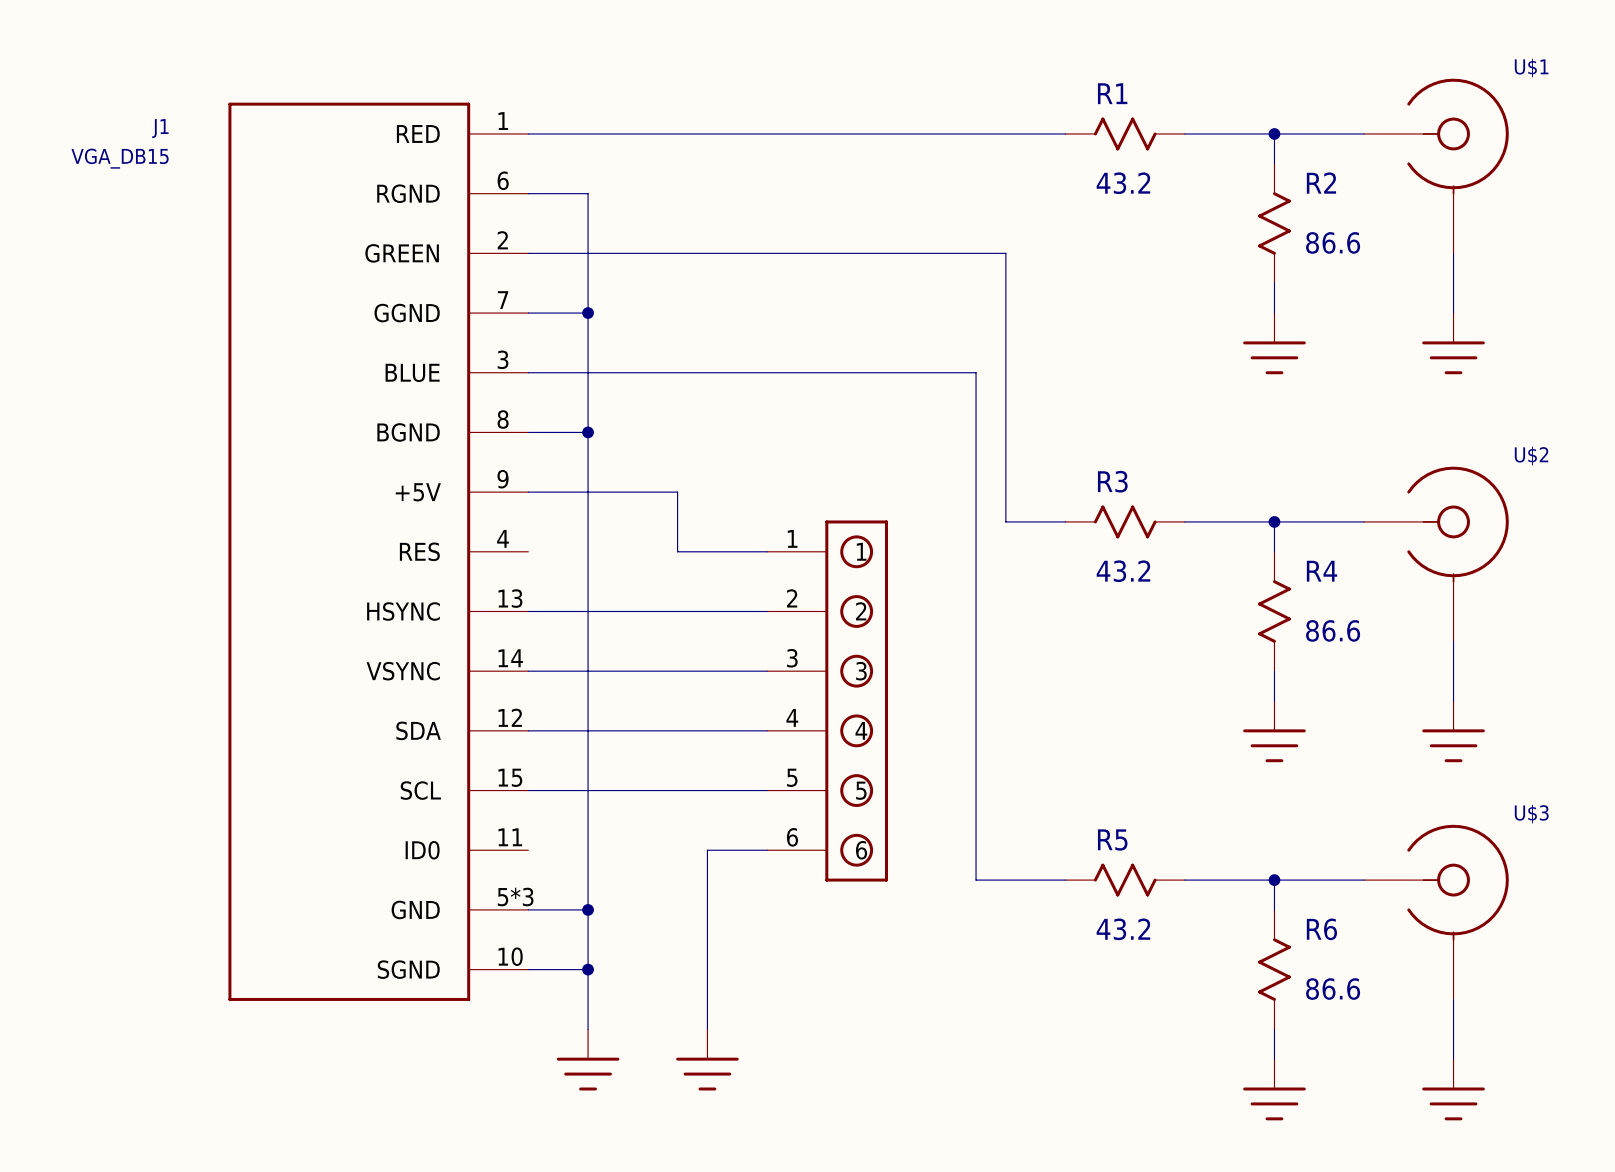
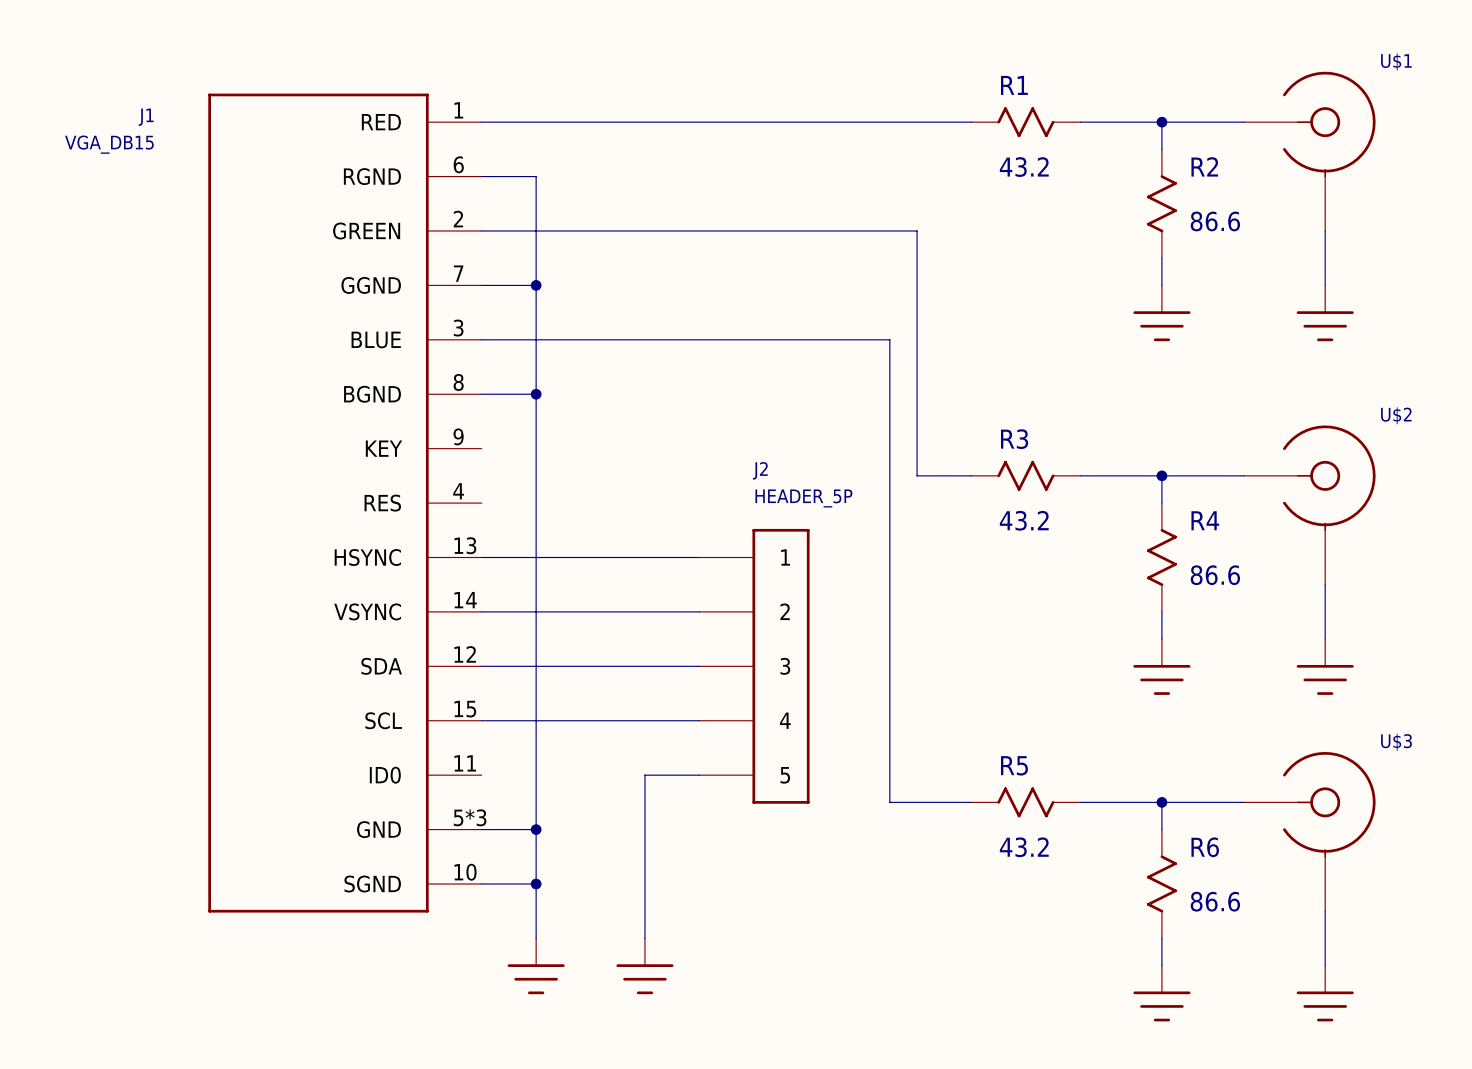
J1 pin name: +5V (418, 492) -> KEY (384, 448)
wire: (528, 492) (677, 492) (677, 551) (767, 551) -> none
part: (827, 701) -> none
J2: none -> HEADER_5P (754, 666)

